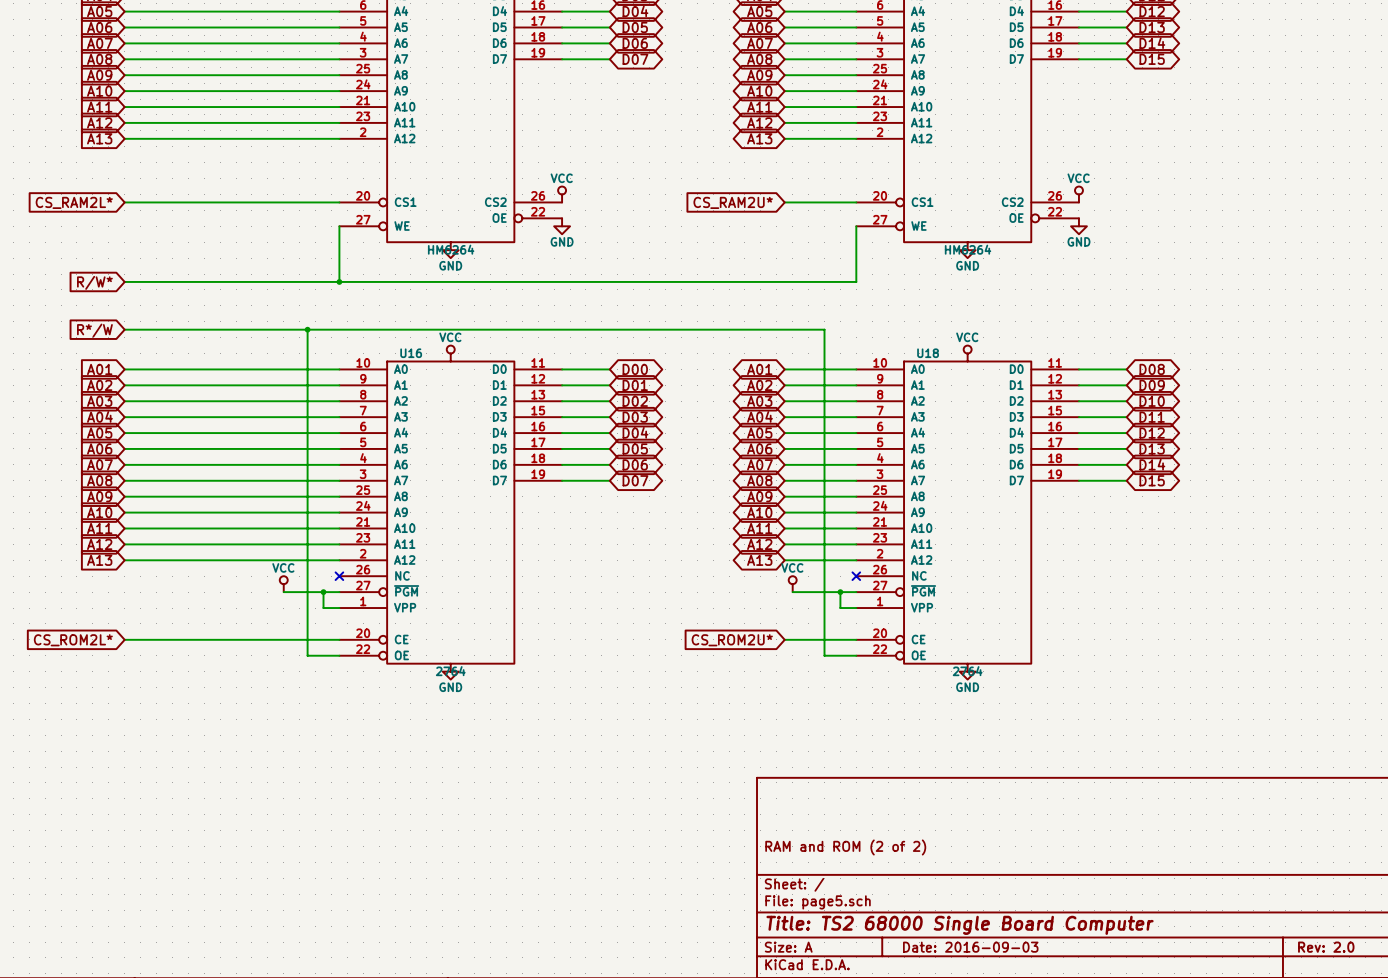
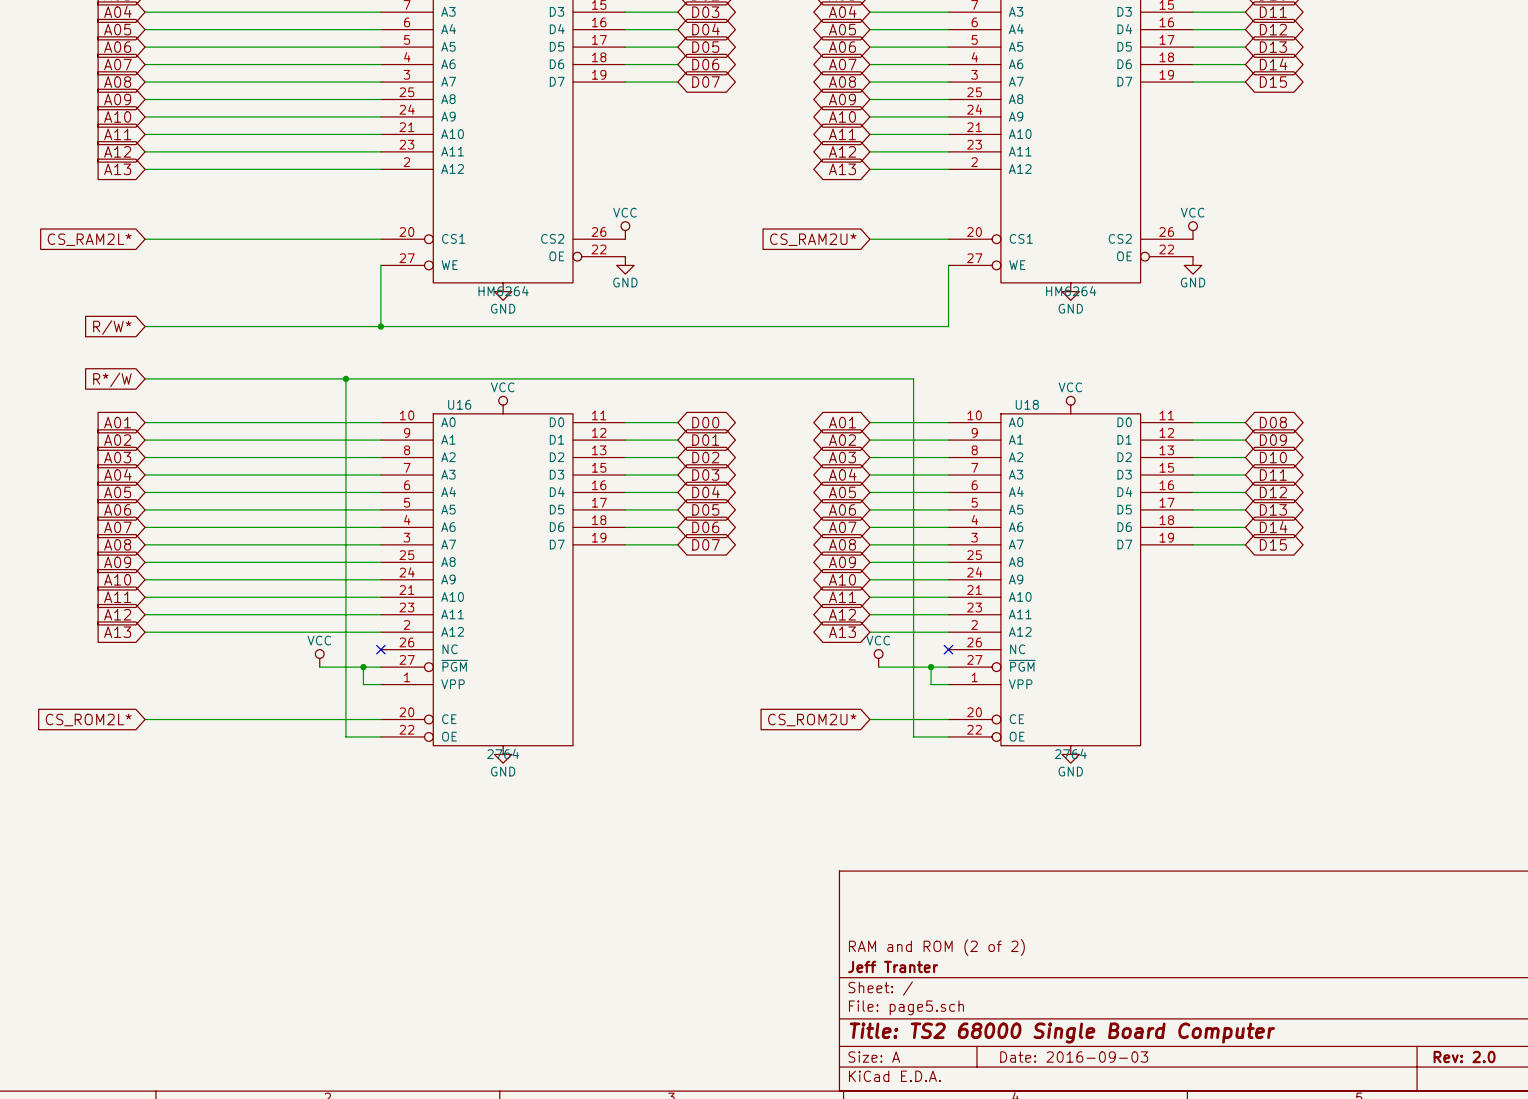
title block: none -> Jeff Tranter (893, 966)

